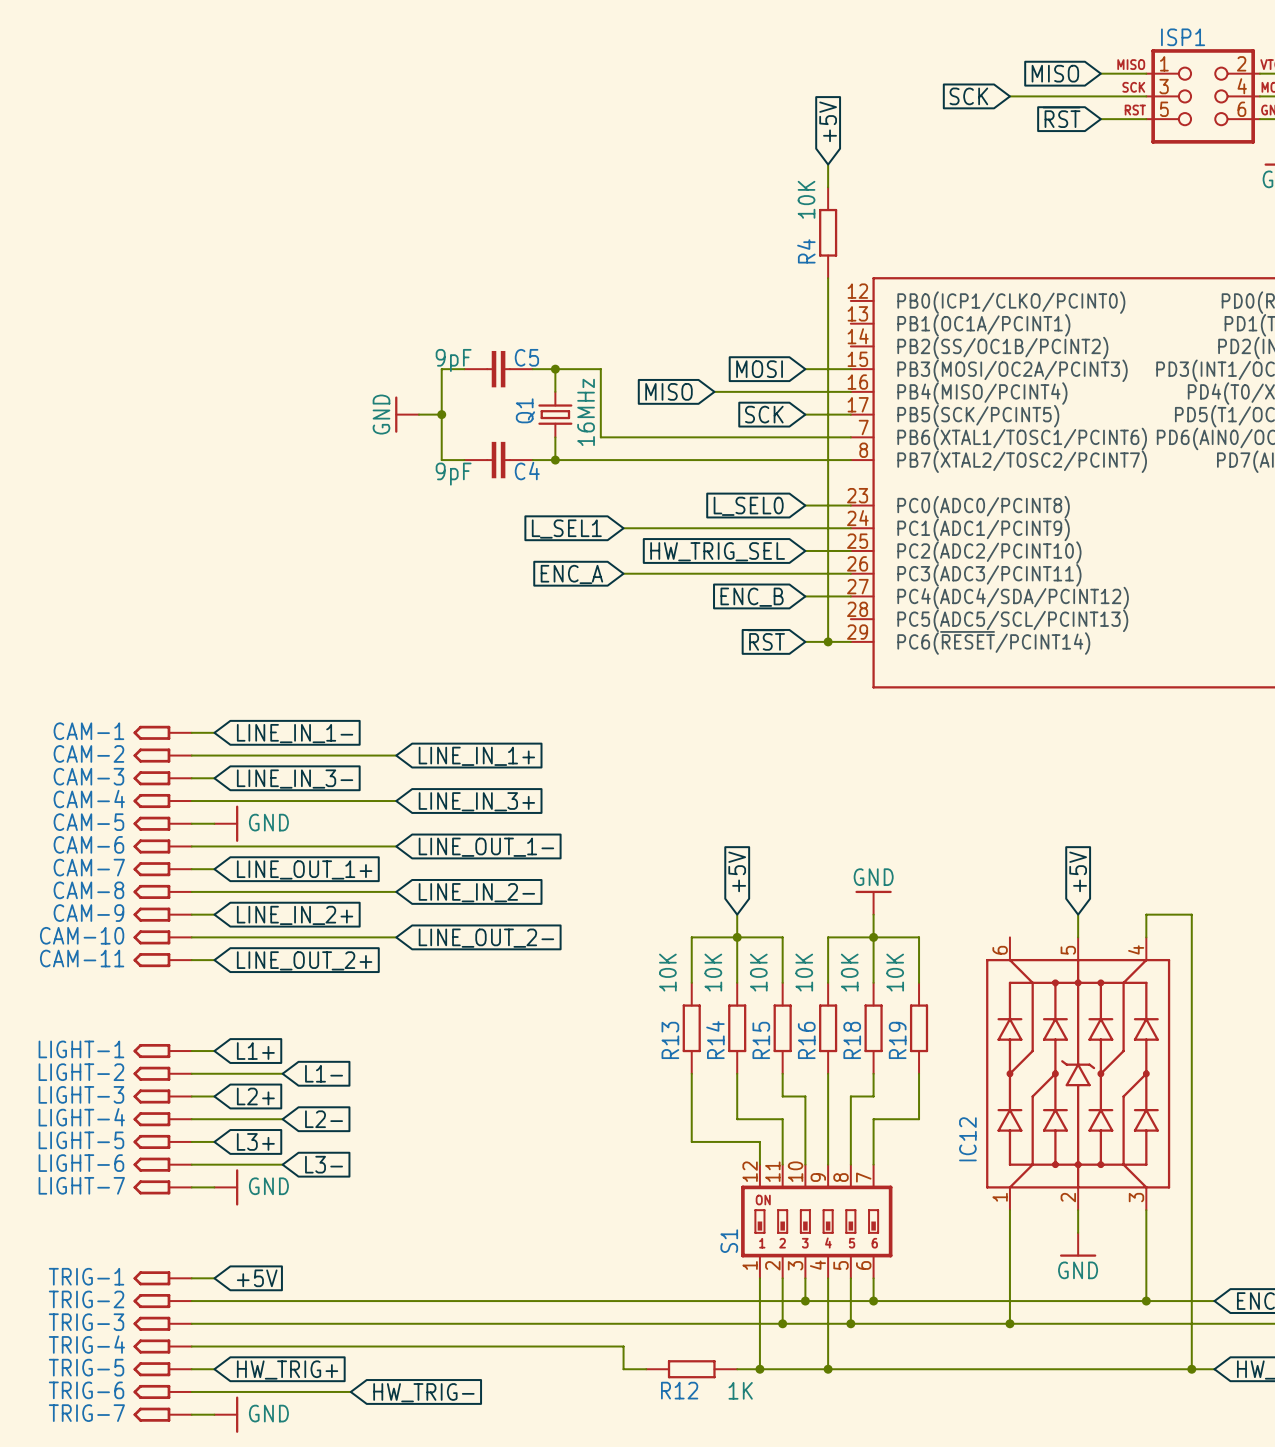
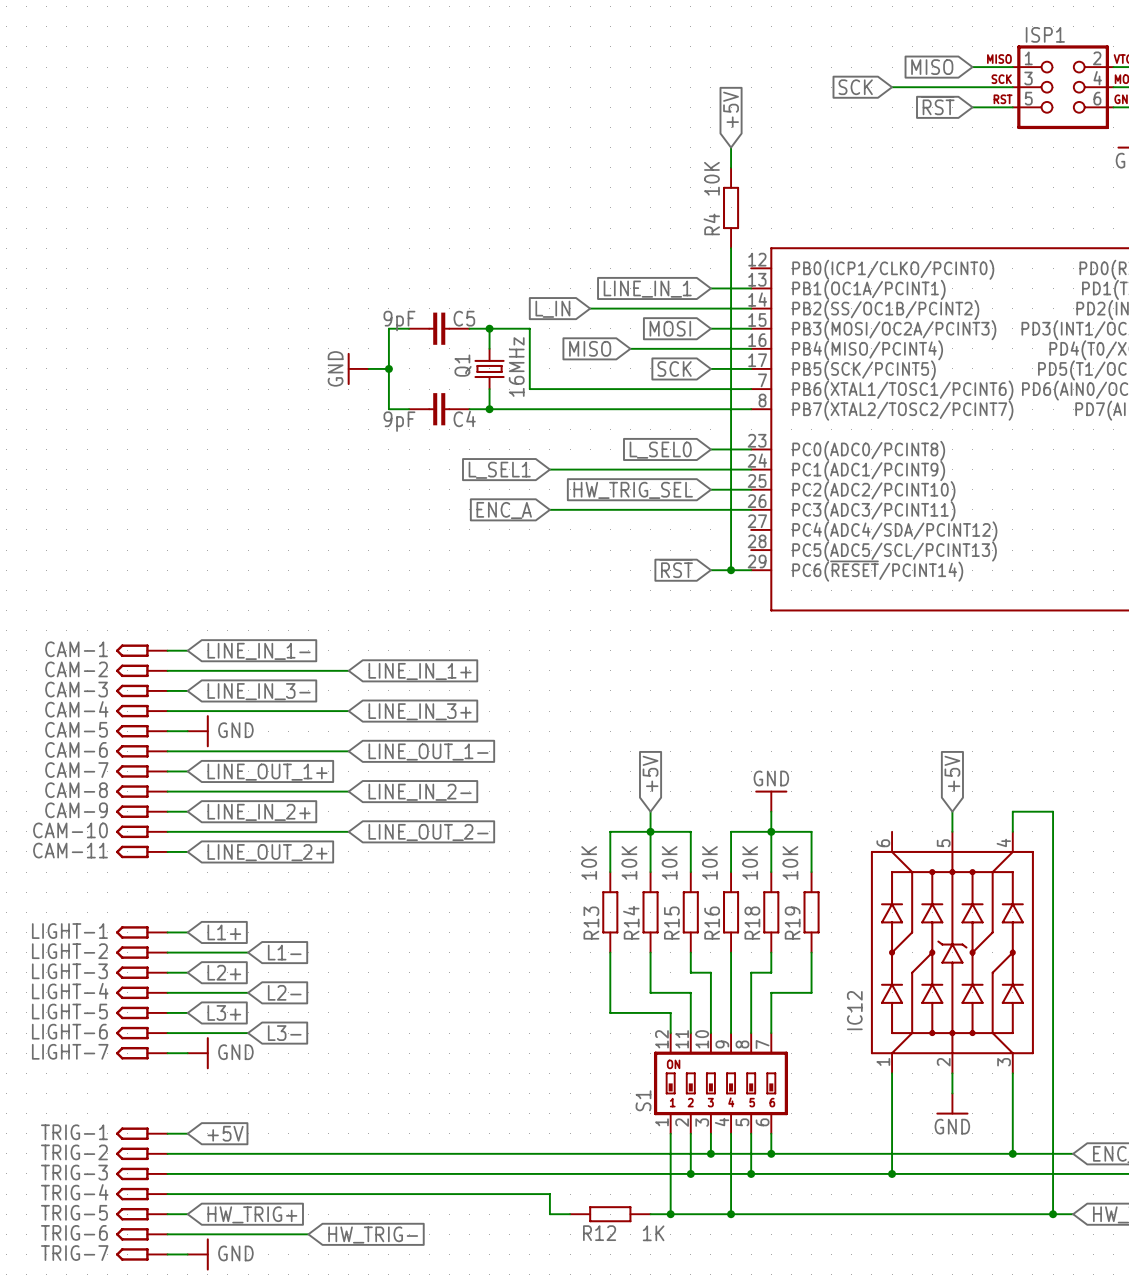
wire: none -> (710, 288) (751, 288)
global label: none -> LINE_IN_1 (647, 289)
wire: none -> (590, 308) (751, 308)
global label: none -> L_IN (552, 309)
wire: (805, 596) (850, 596) -> none
global label: ENC_B (752, 597) -> none

